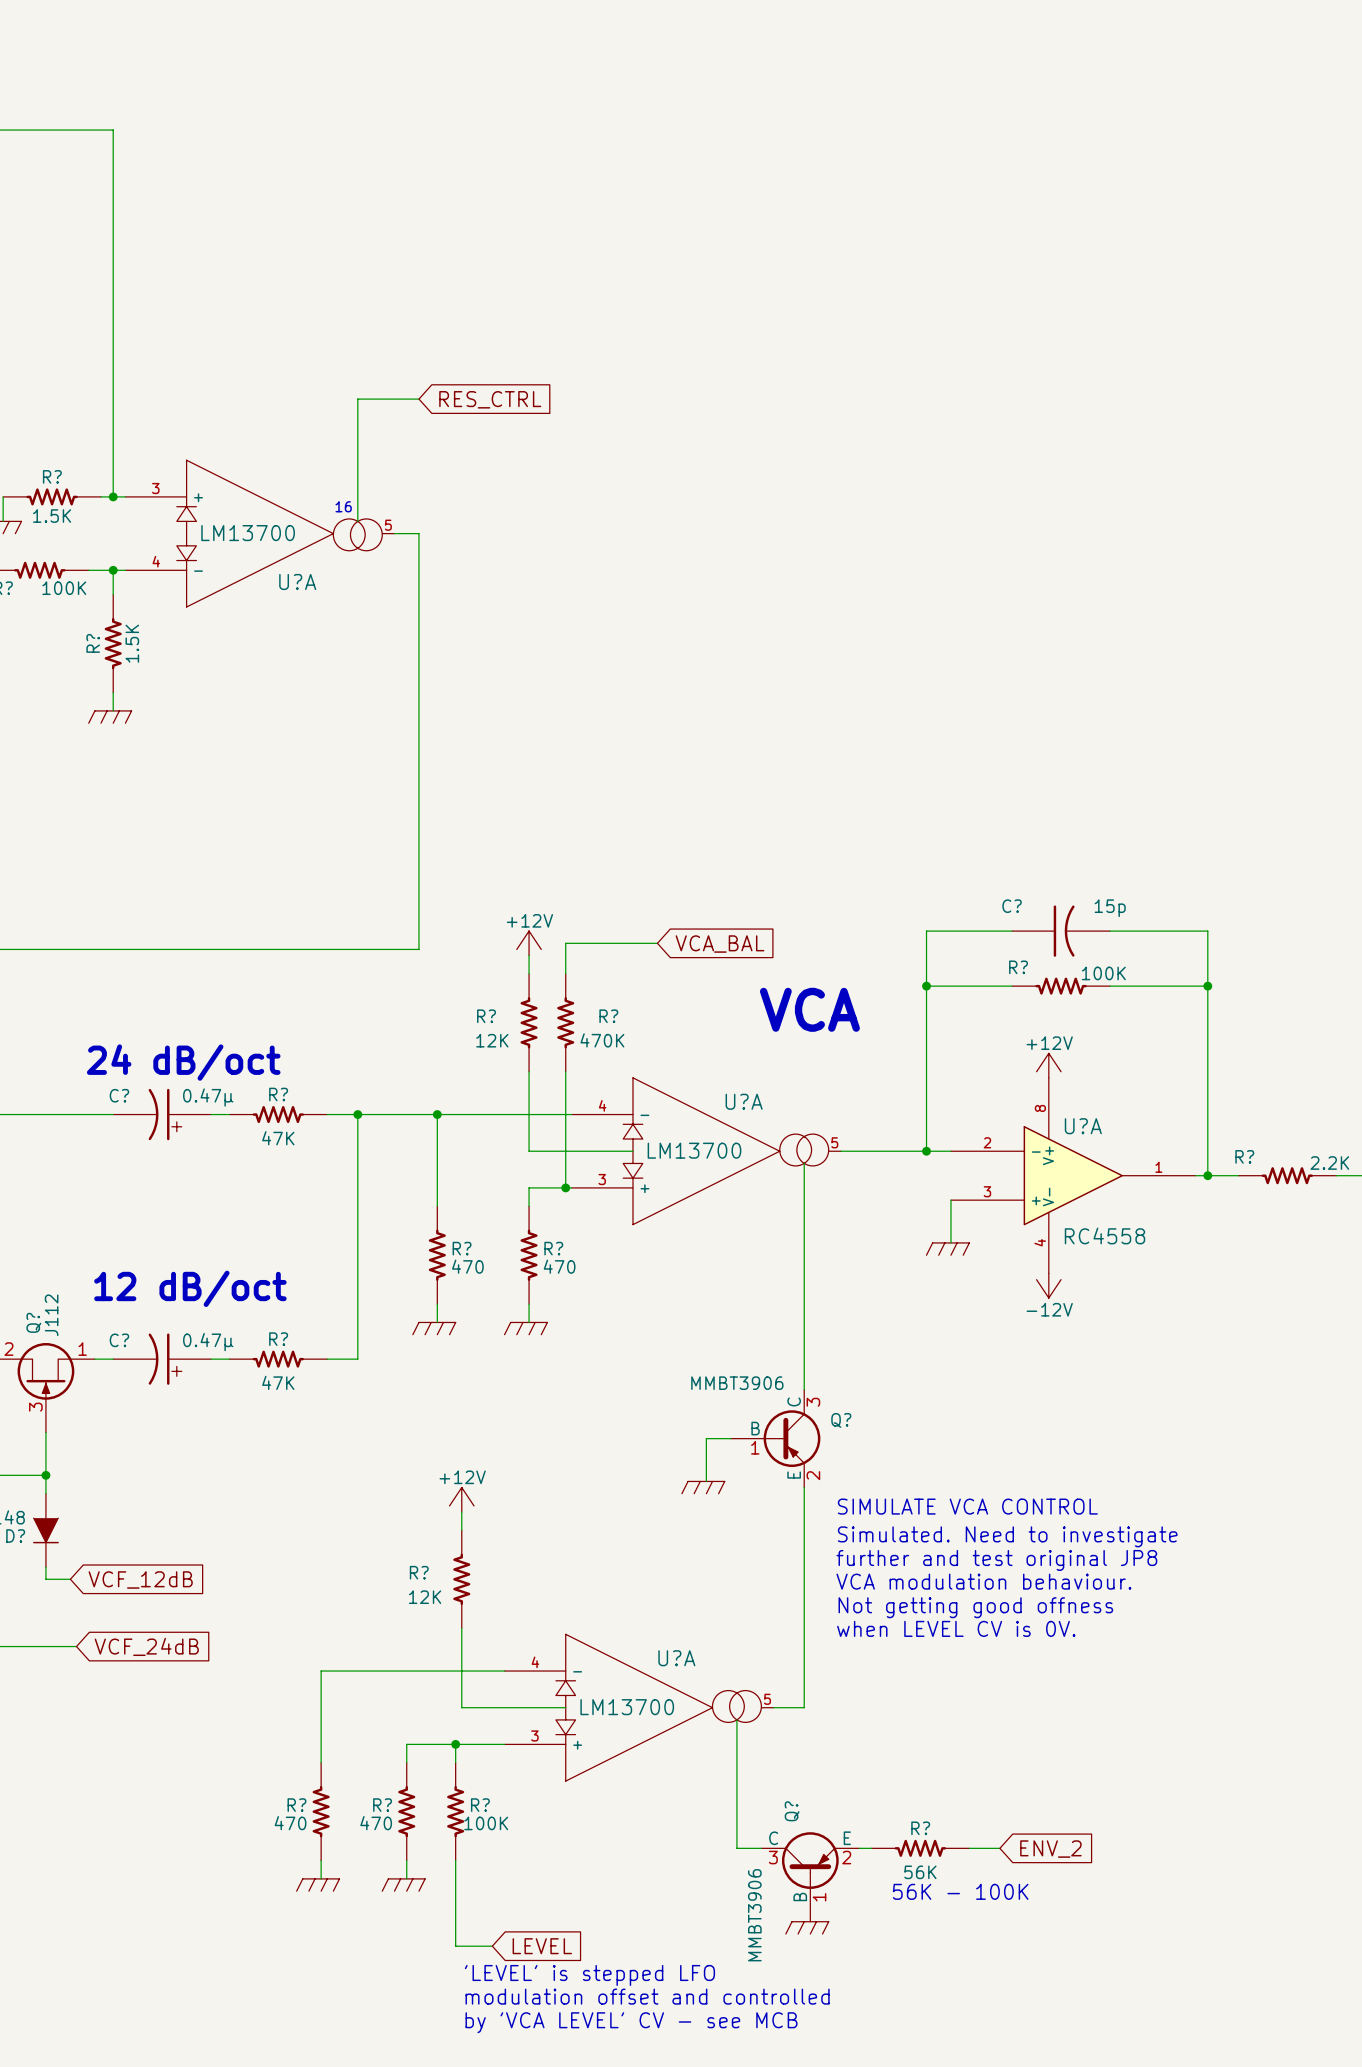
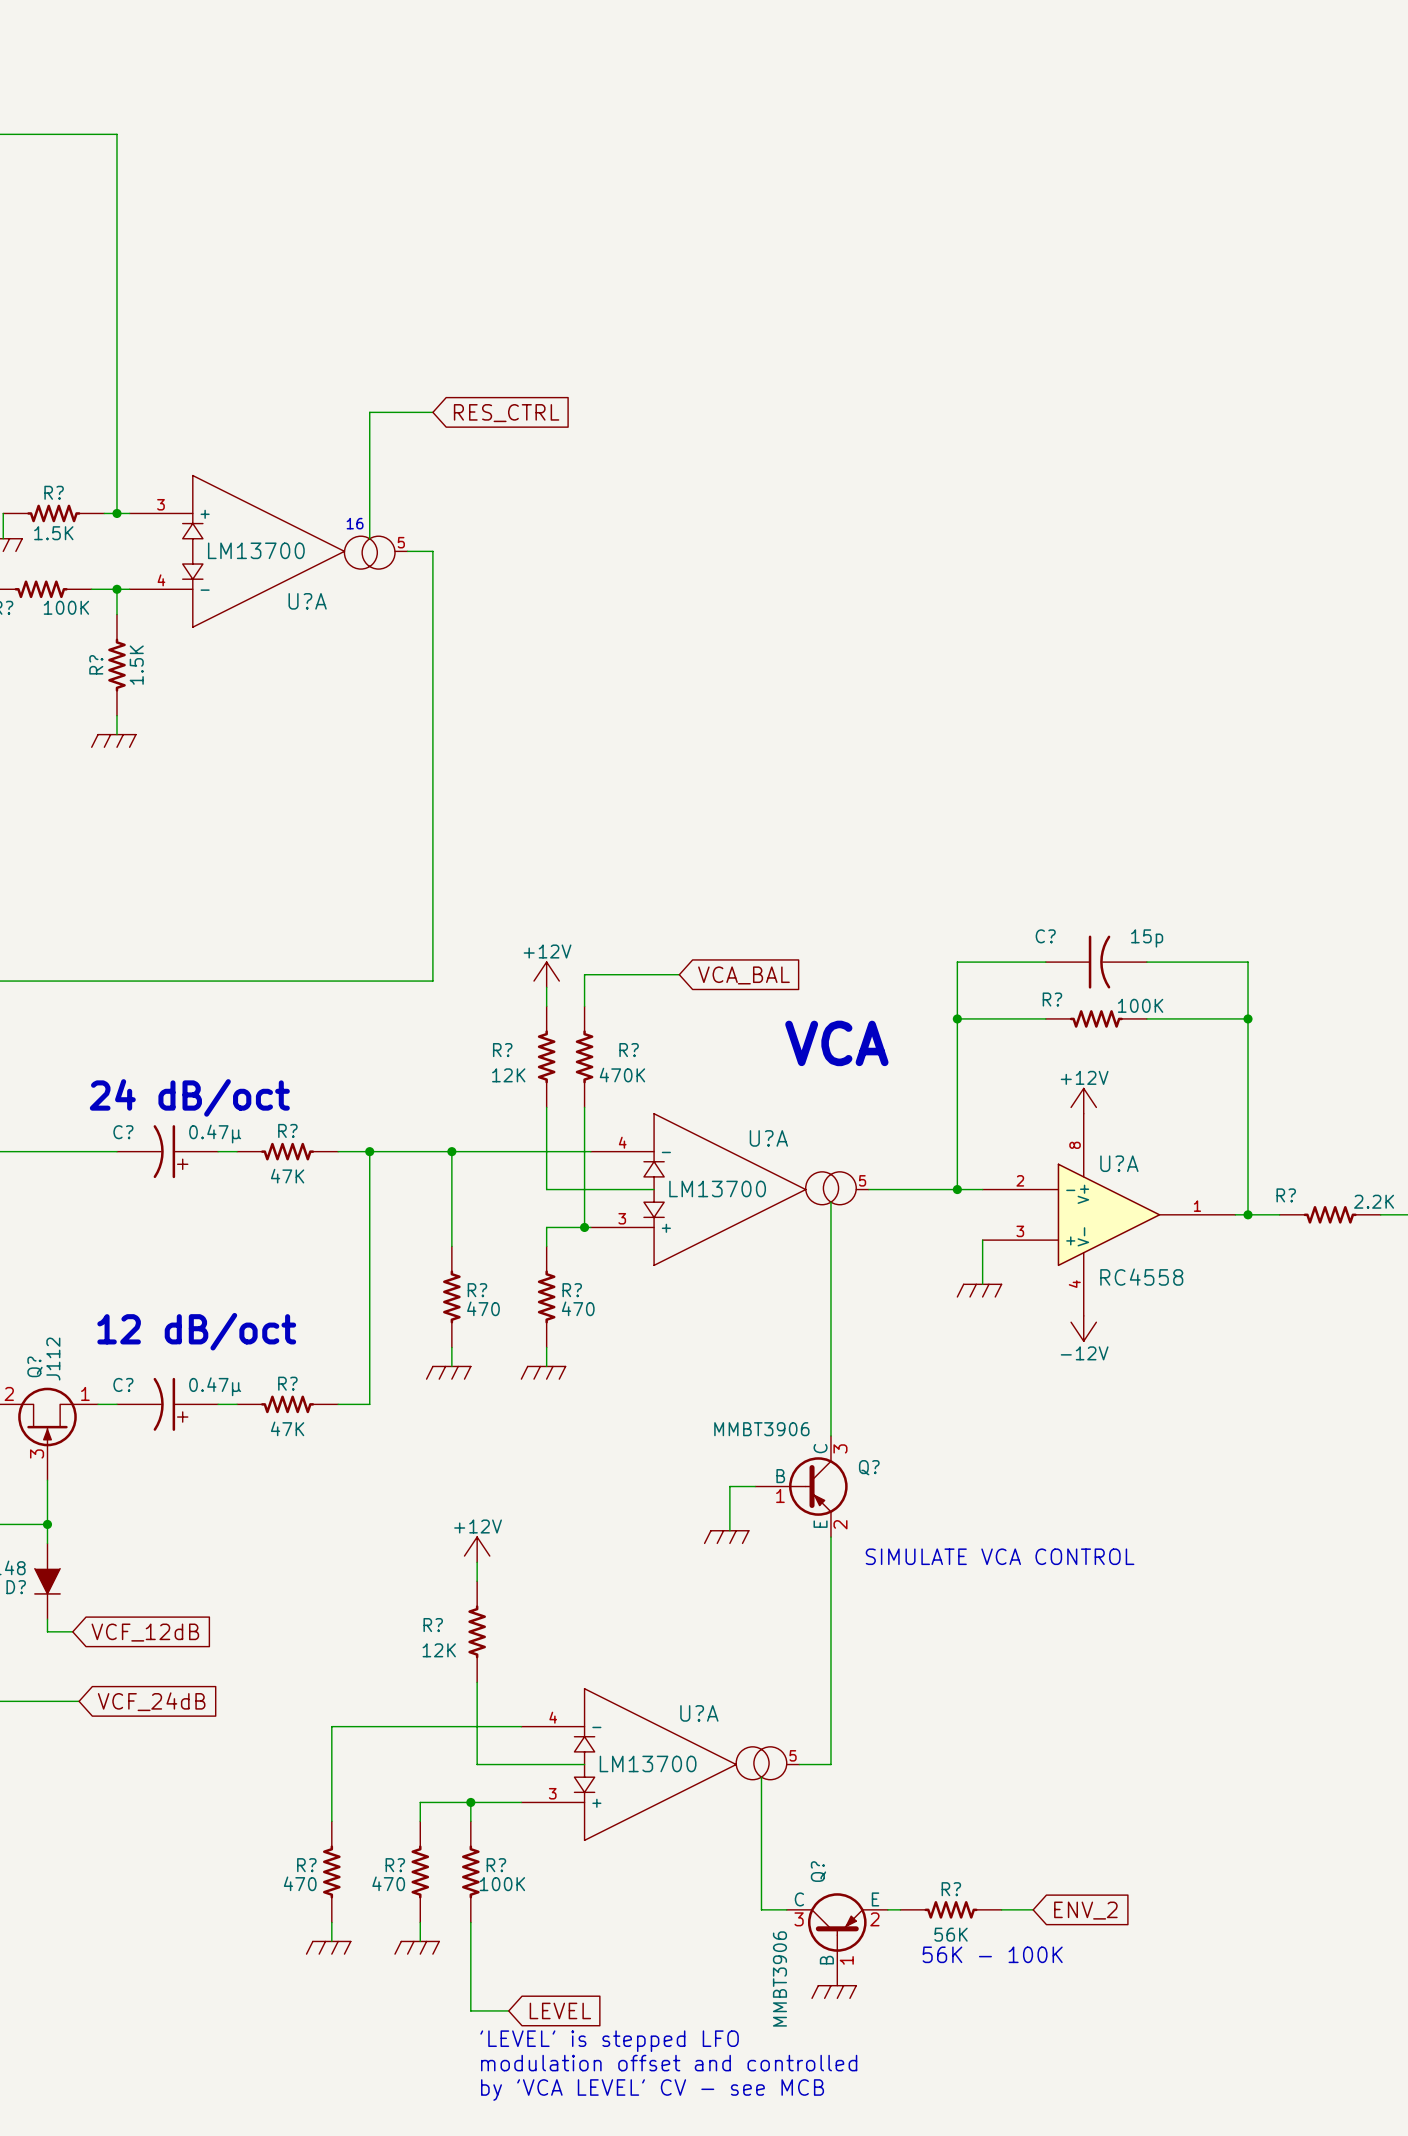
text: Simulated. Need to investigate (1007, 1536) -> none
text: further and test original JP8 (996, 1560) -> none
text: VCA modulation behaviour. (983, 1581) -> none
text: Not getting good offness (975, 1607) -> none
text: when LEVEL CV is 0V. (956, 1628) -> none

